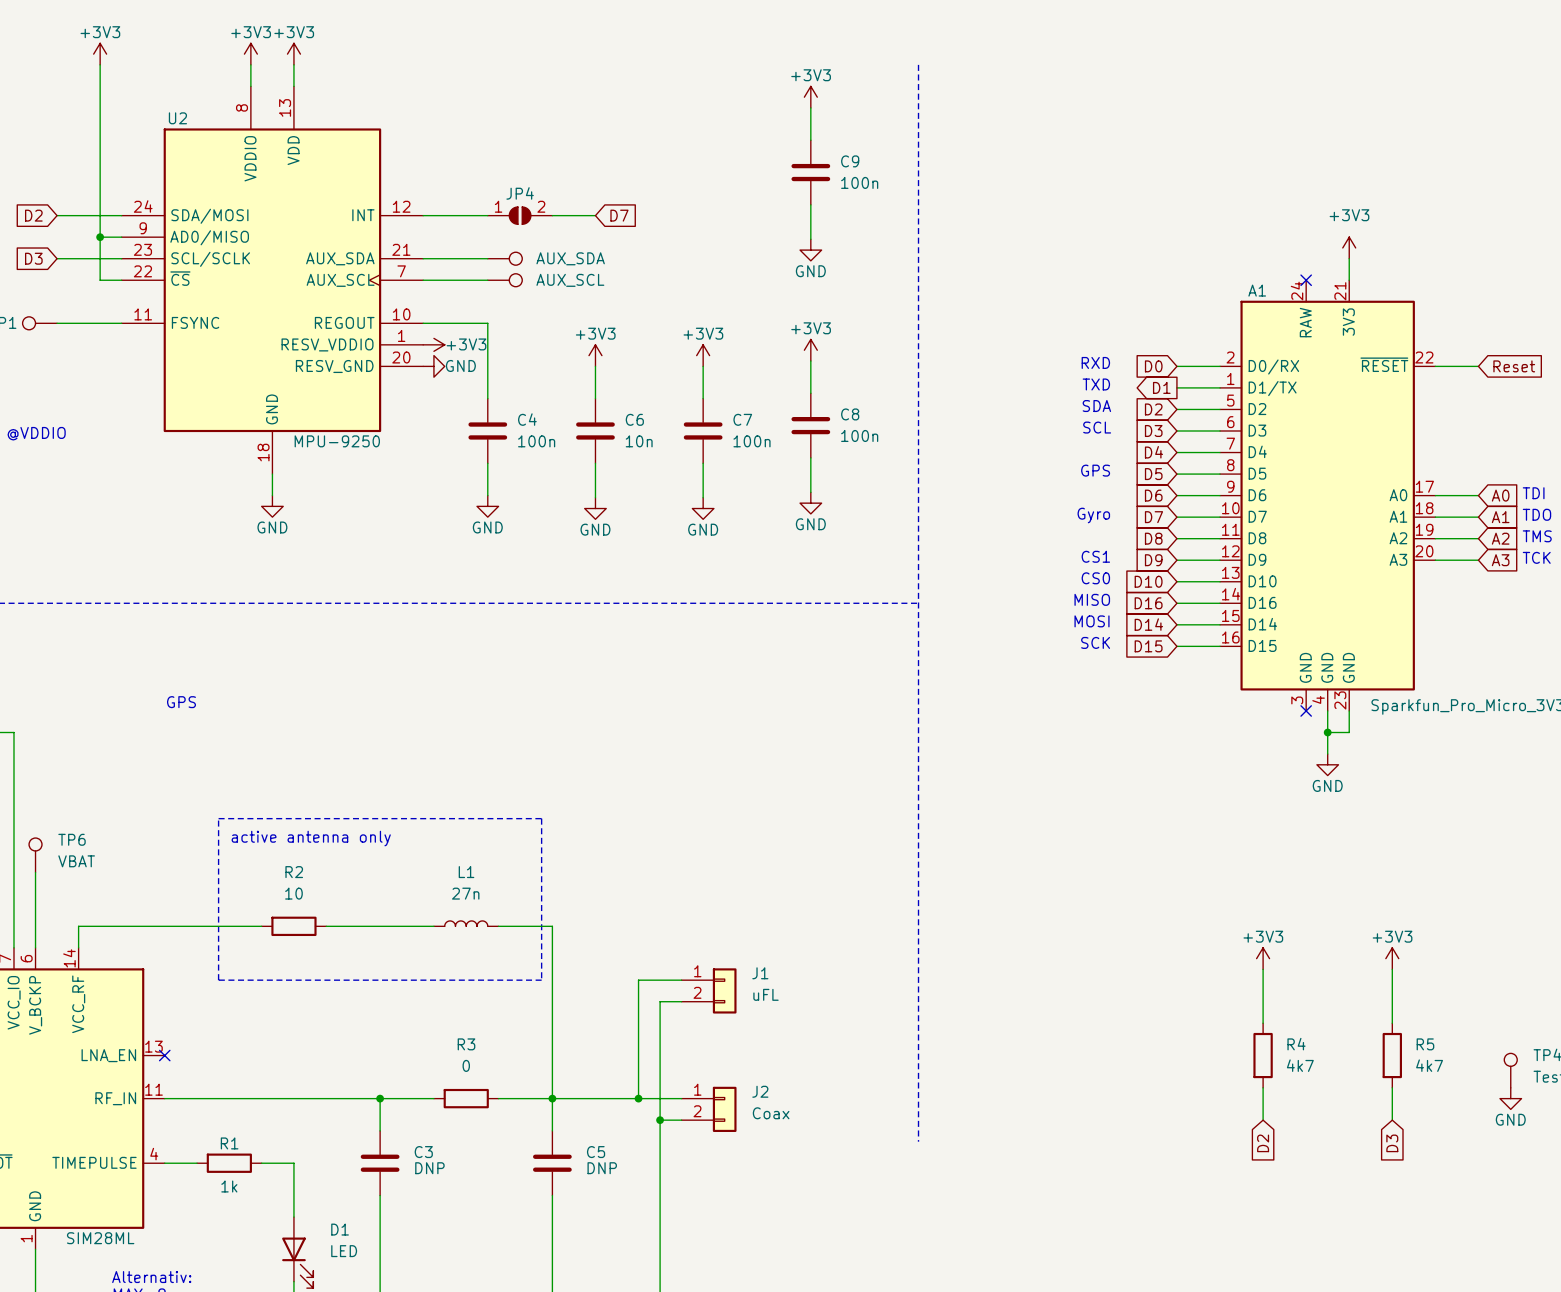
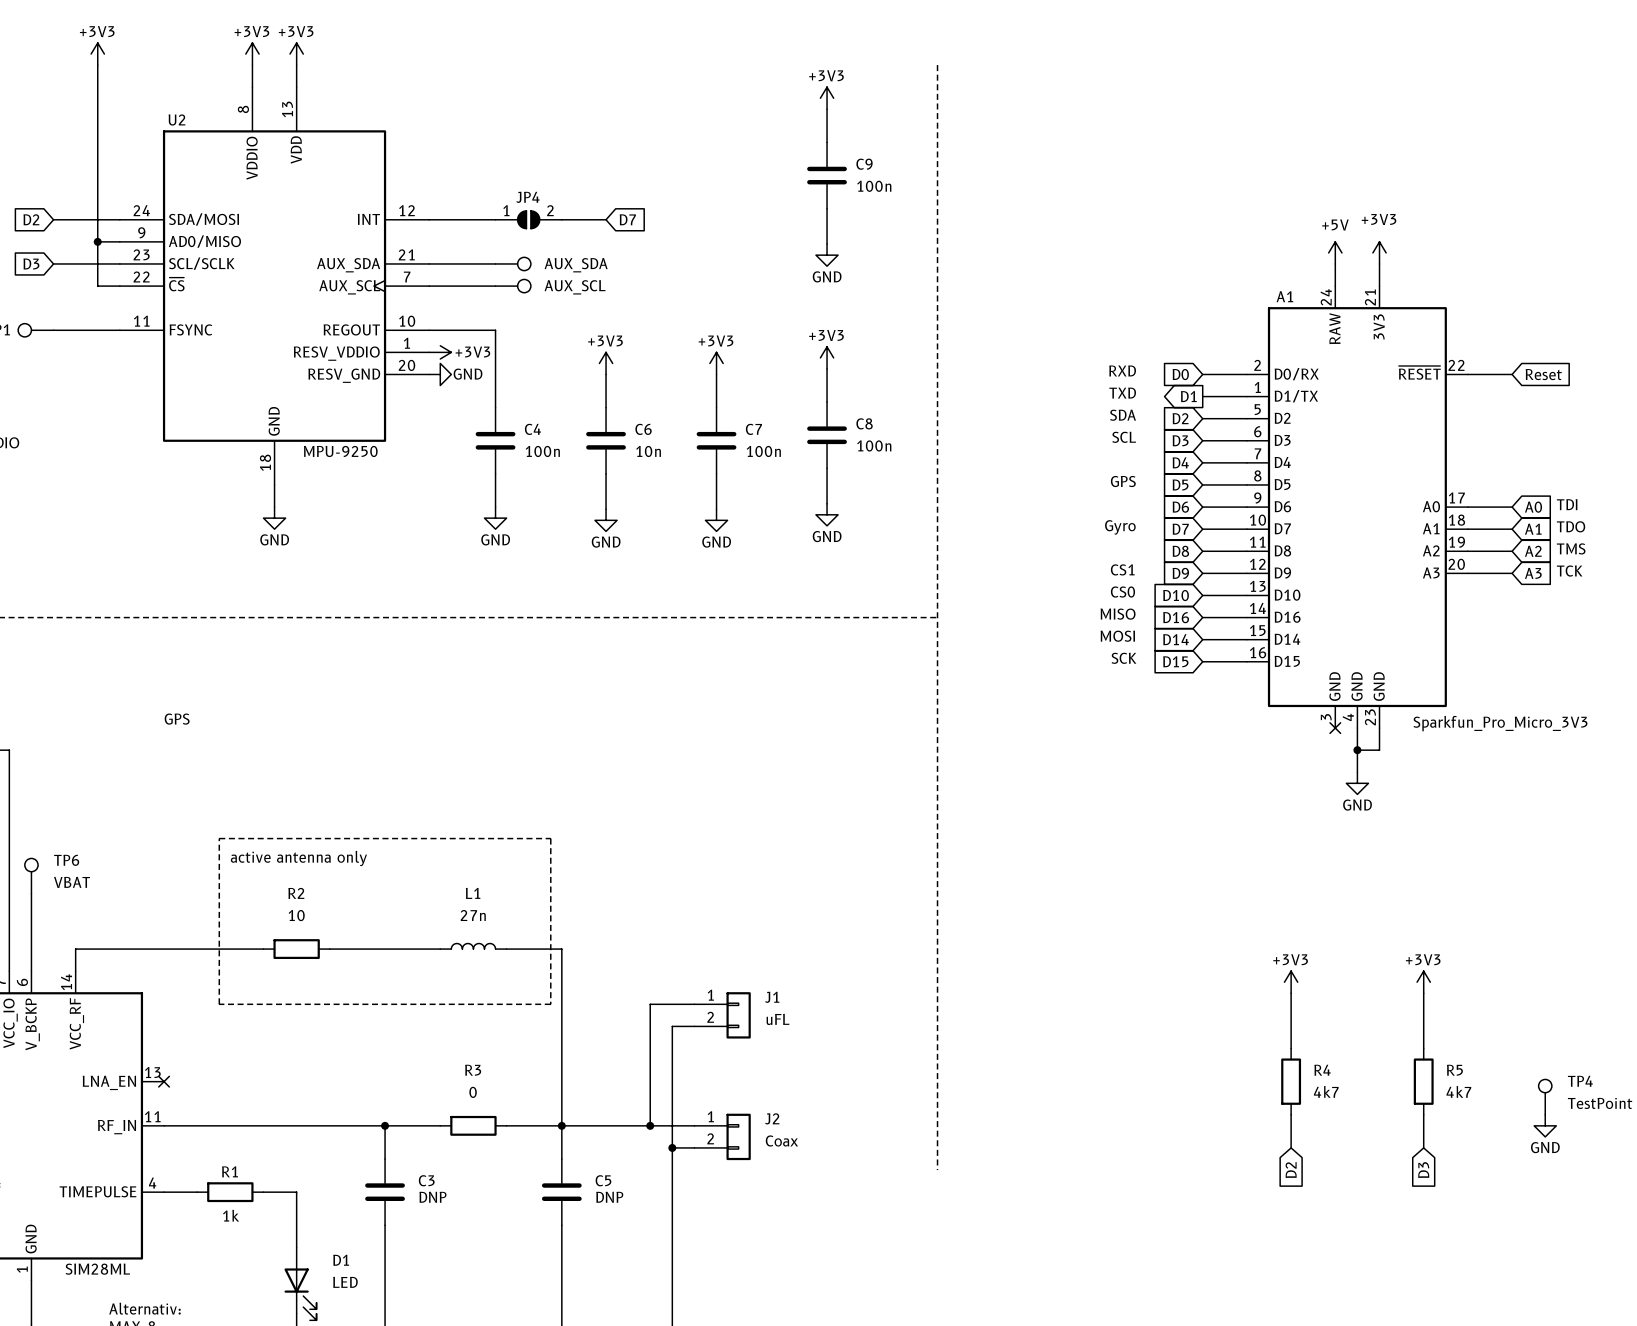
power symbol: none -> +5V (1335, 252)
wire: none -> (1335, 263) (1335, 286)
no-connect mark: (1306, 280) -> none

